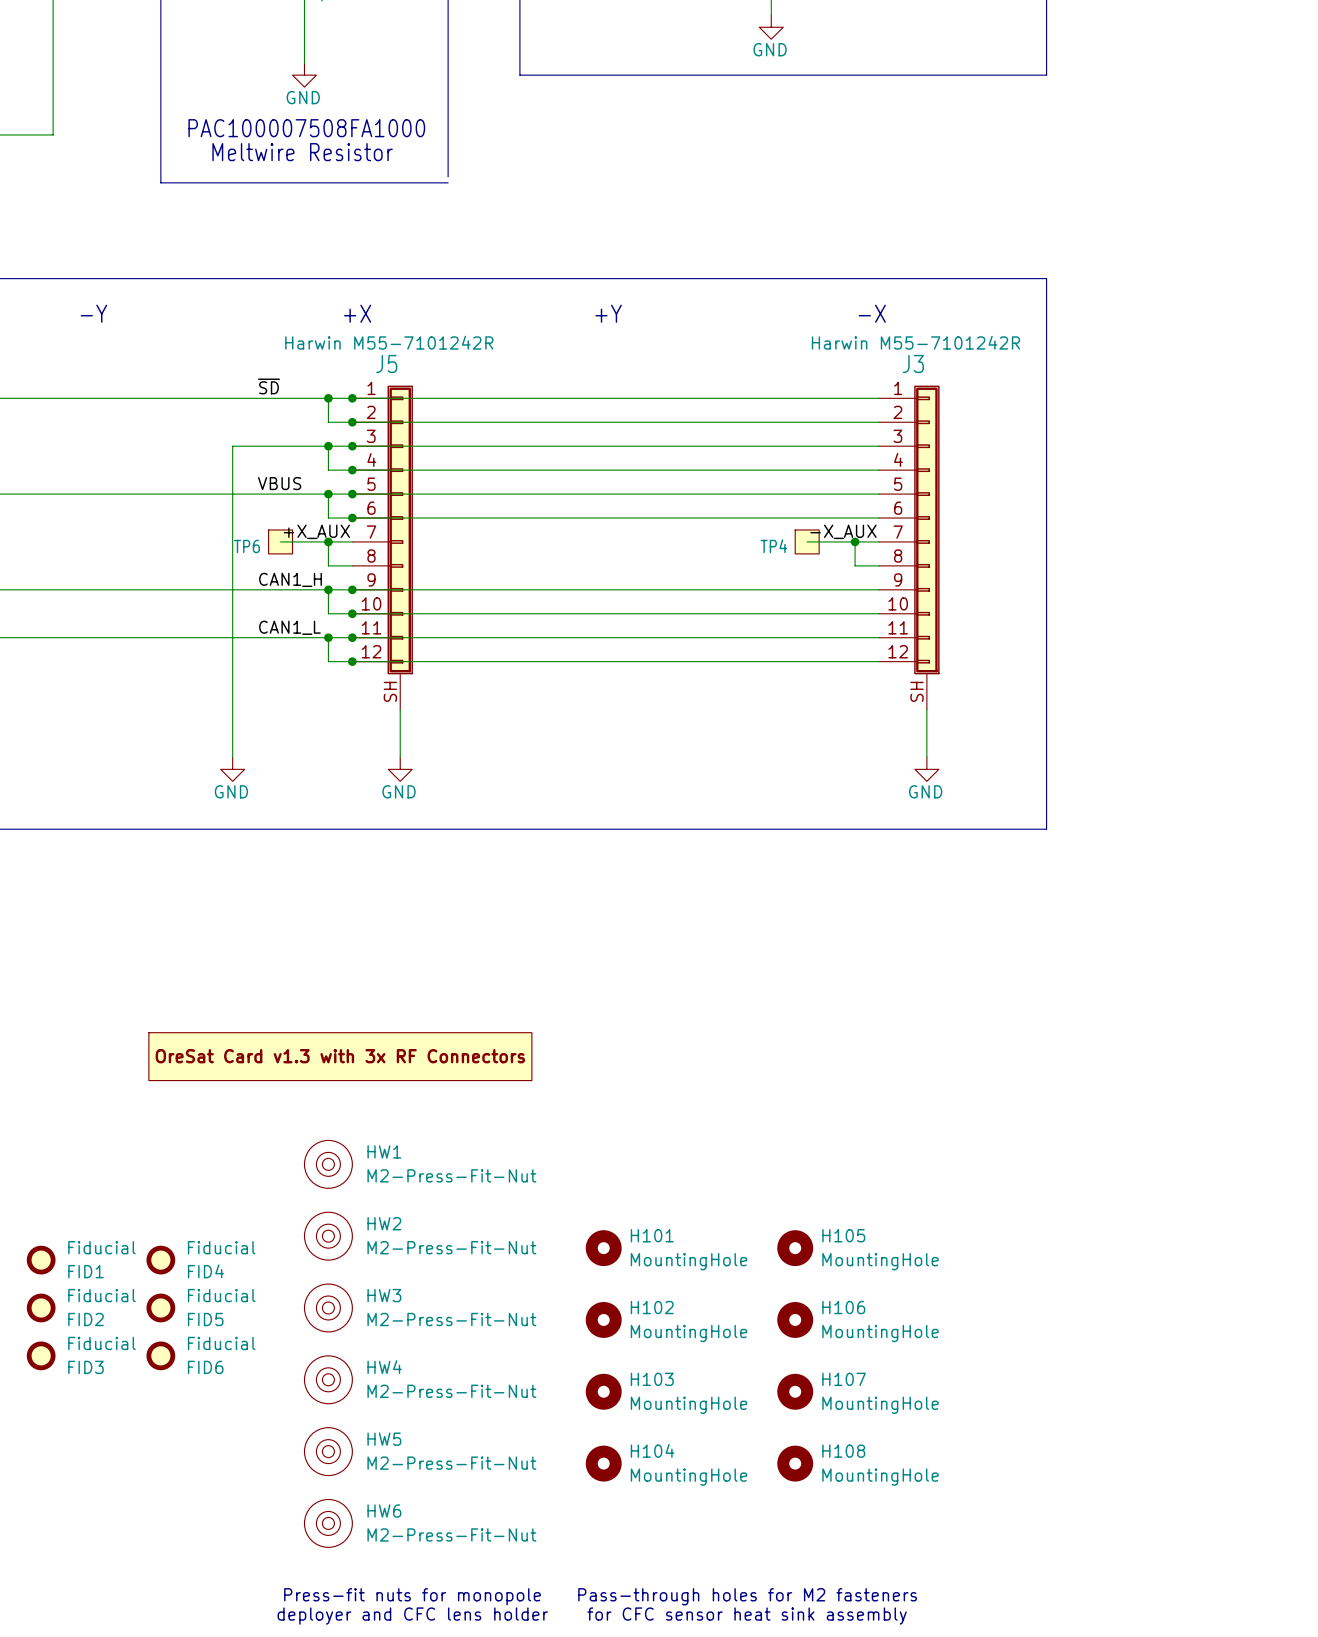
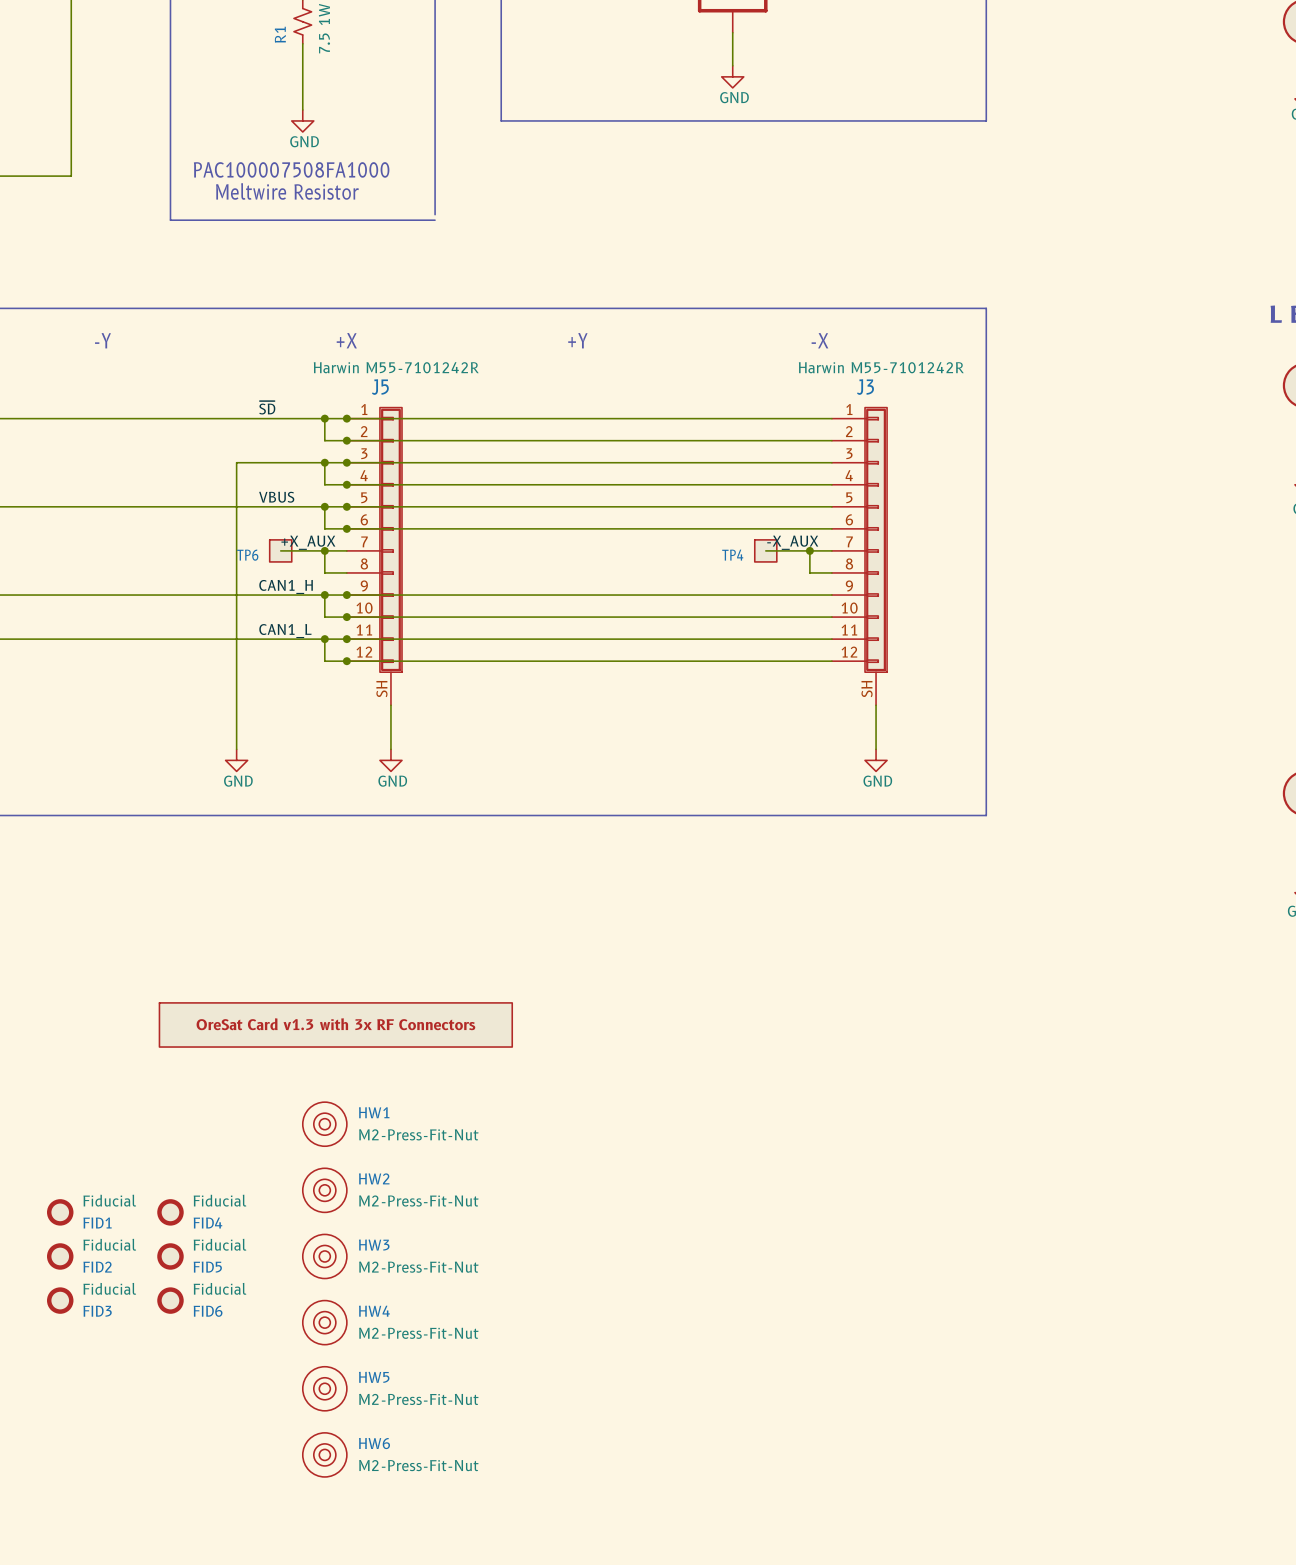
H101: MountingHole (603, 1248) -> none
H105: MountingHole (795, 1248) -> none
H102: MountingHole (603, 1319) -> none
H106: MountingHole (795, 1319) -> none
H103: MountingHole (603, 1391) -> none
H107: MountingHole (795, 1391) -> none
H104: MountingHole (603, 1463) -> none
H108: MountingHole (795, 1463) -> none
text: Press-fit nuts for monopole (412, 1596) -> none
text: Pass-through holes for M2 fasteners (747, 1596) -> none
text: deployer and CFC lens holder (412, 1616) -> none
text: for CFC sensor heat sink assembly (747, 1616) -> none

